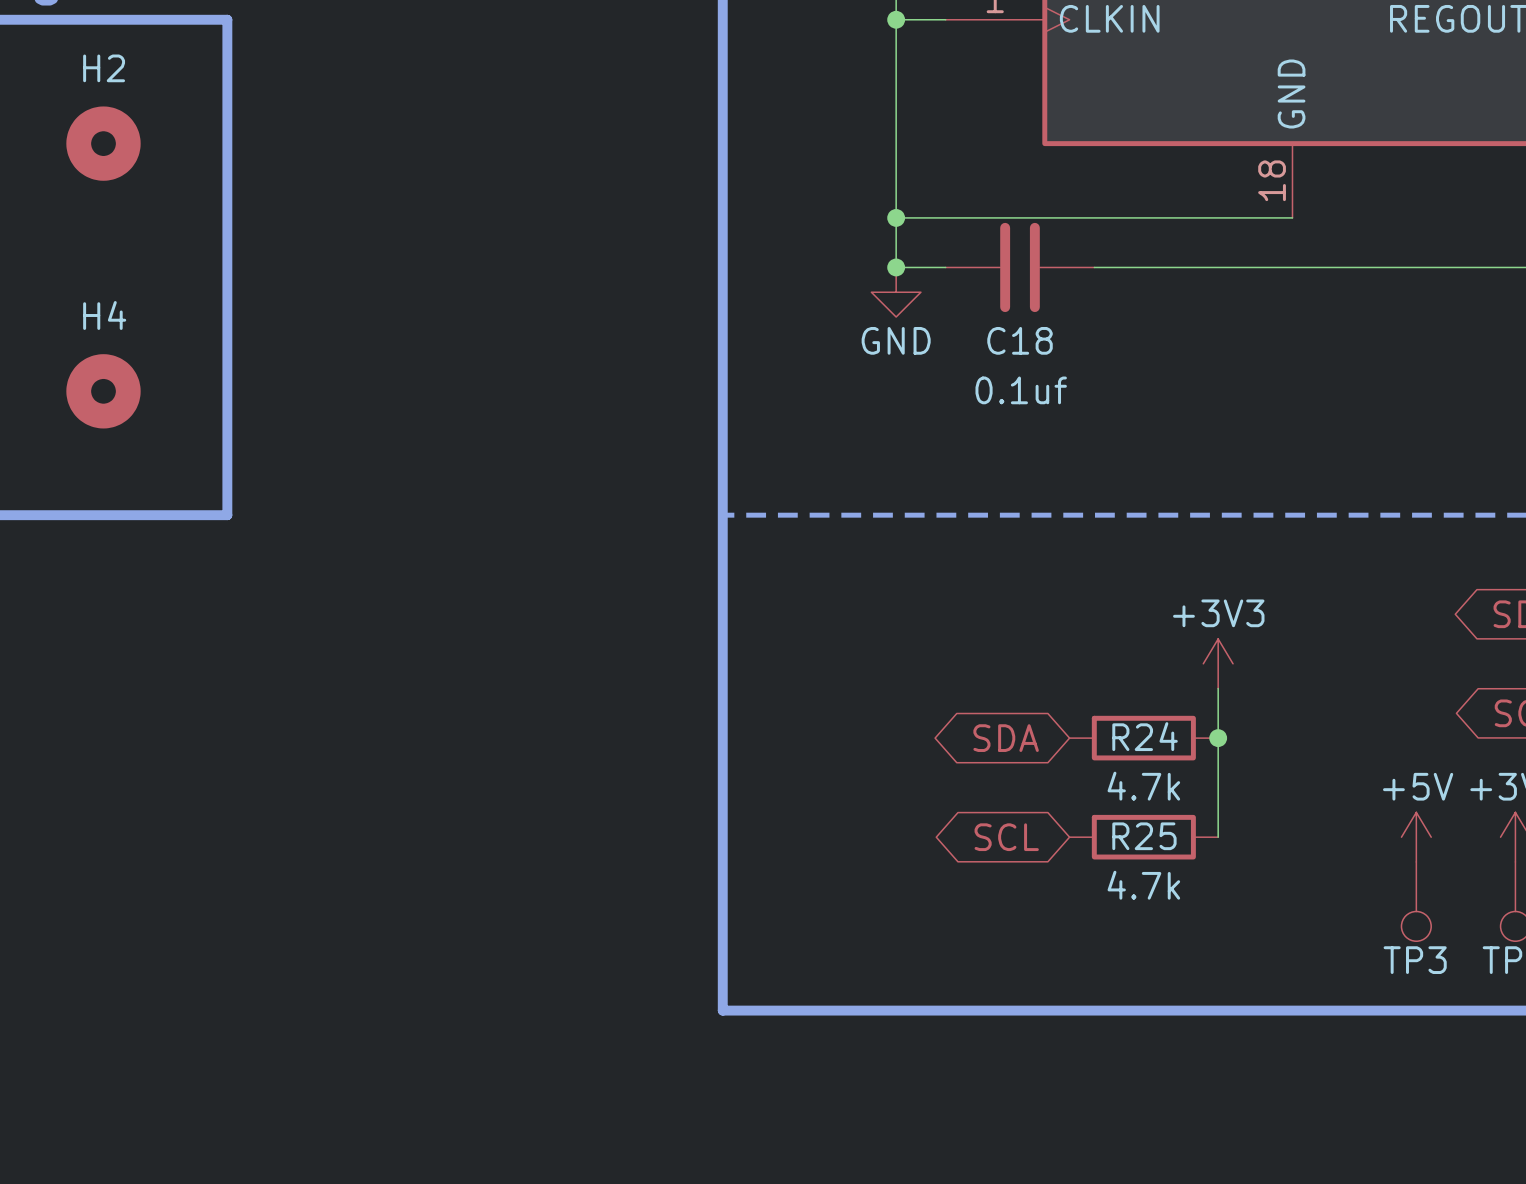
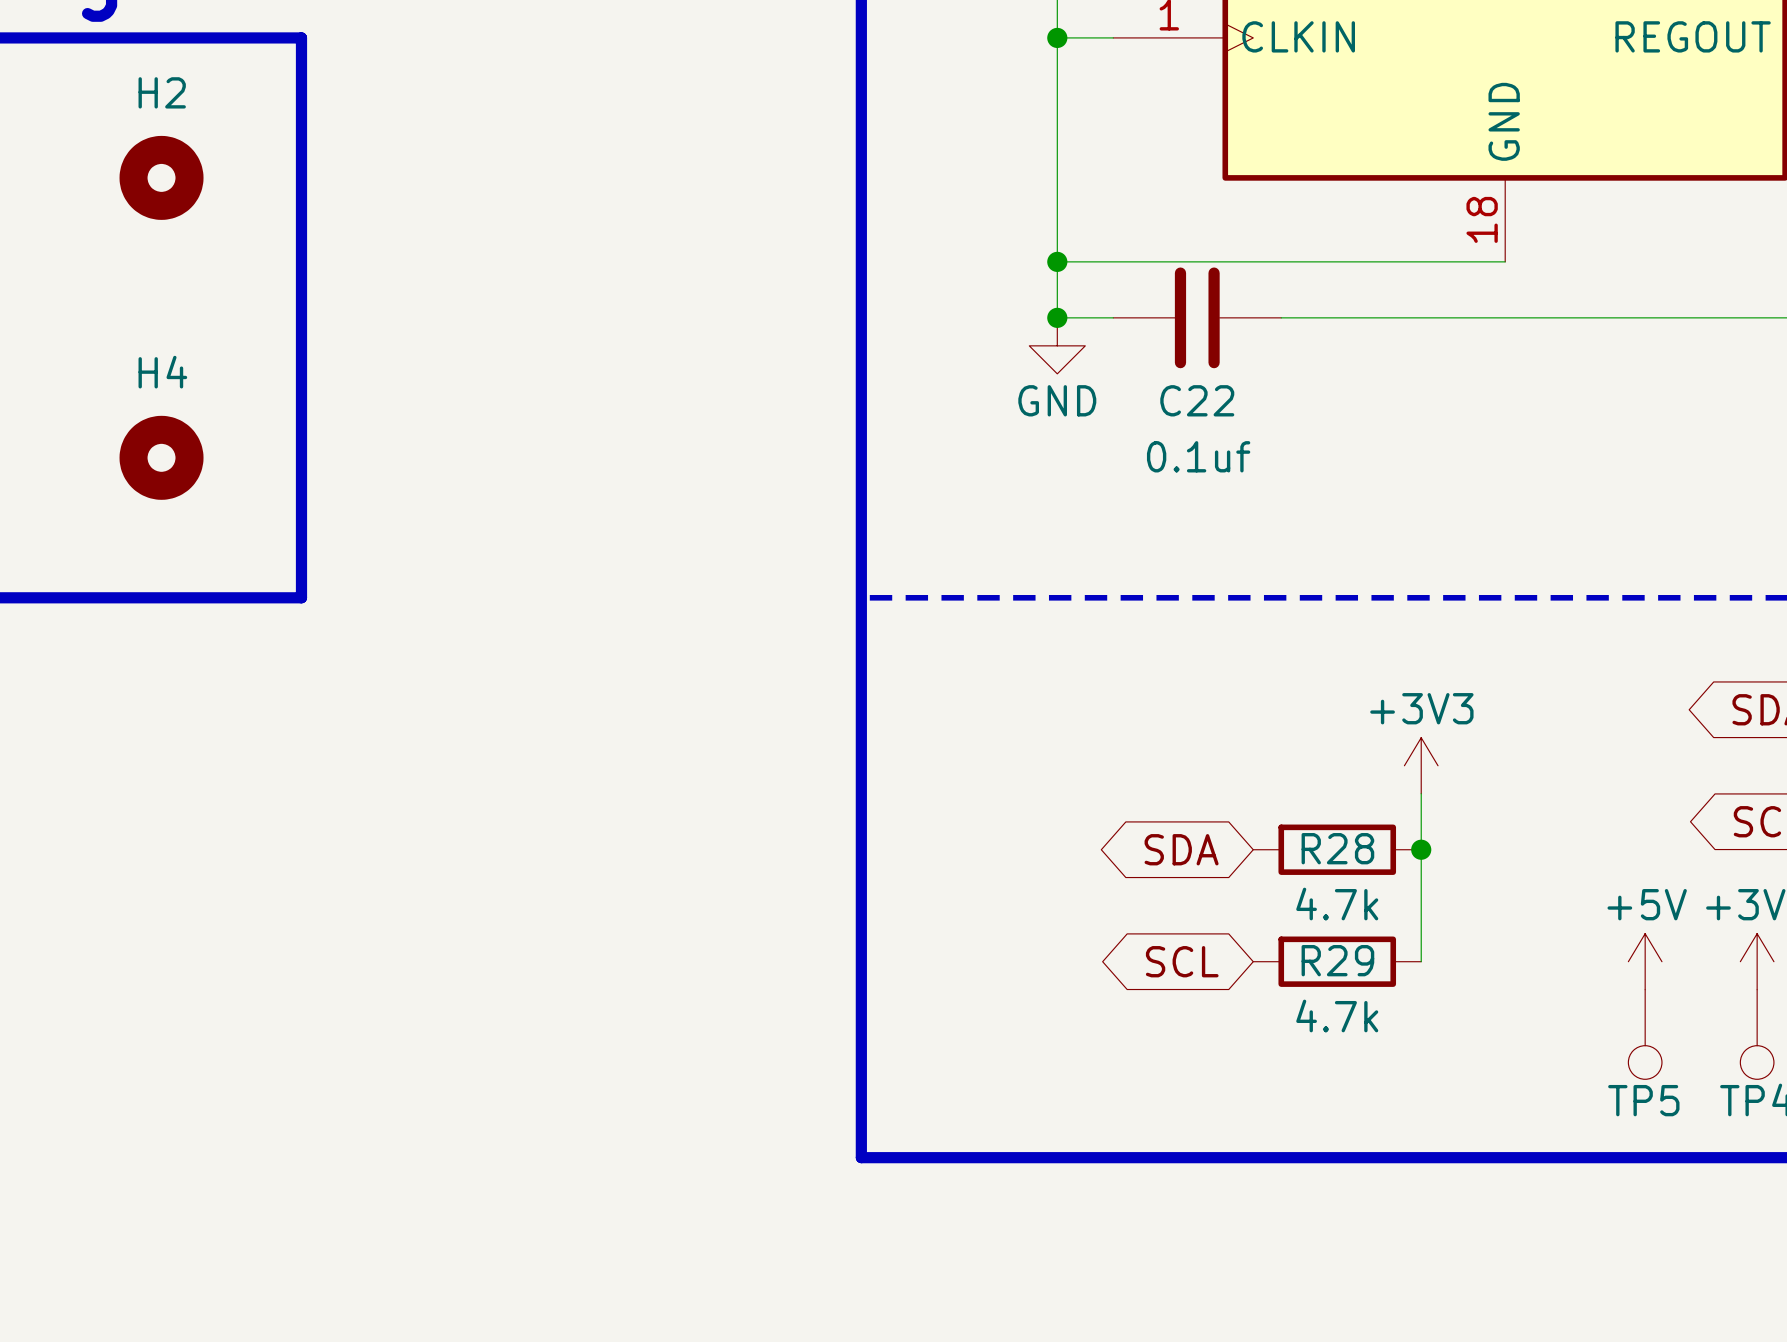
C18 name: C18 (1020, 340) -> C22 (1197, 400)
R24 name: R24 (1145, 736) -> R28 (1337, 848)
R25 name: R25 (1144, 836) -> R29 (1337, 960)
TP3 name: TP3 (1415, 960) -> TP5 (1643, 1100)

